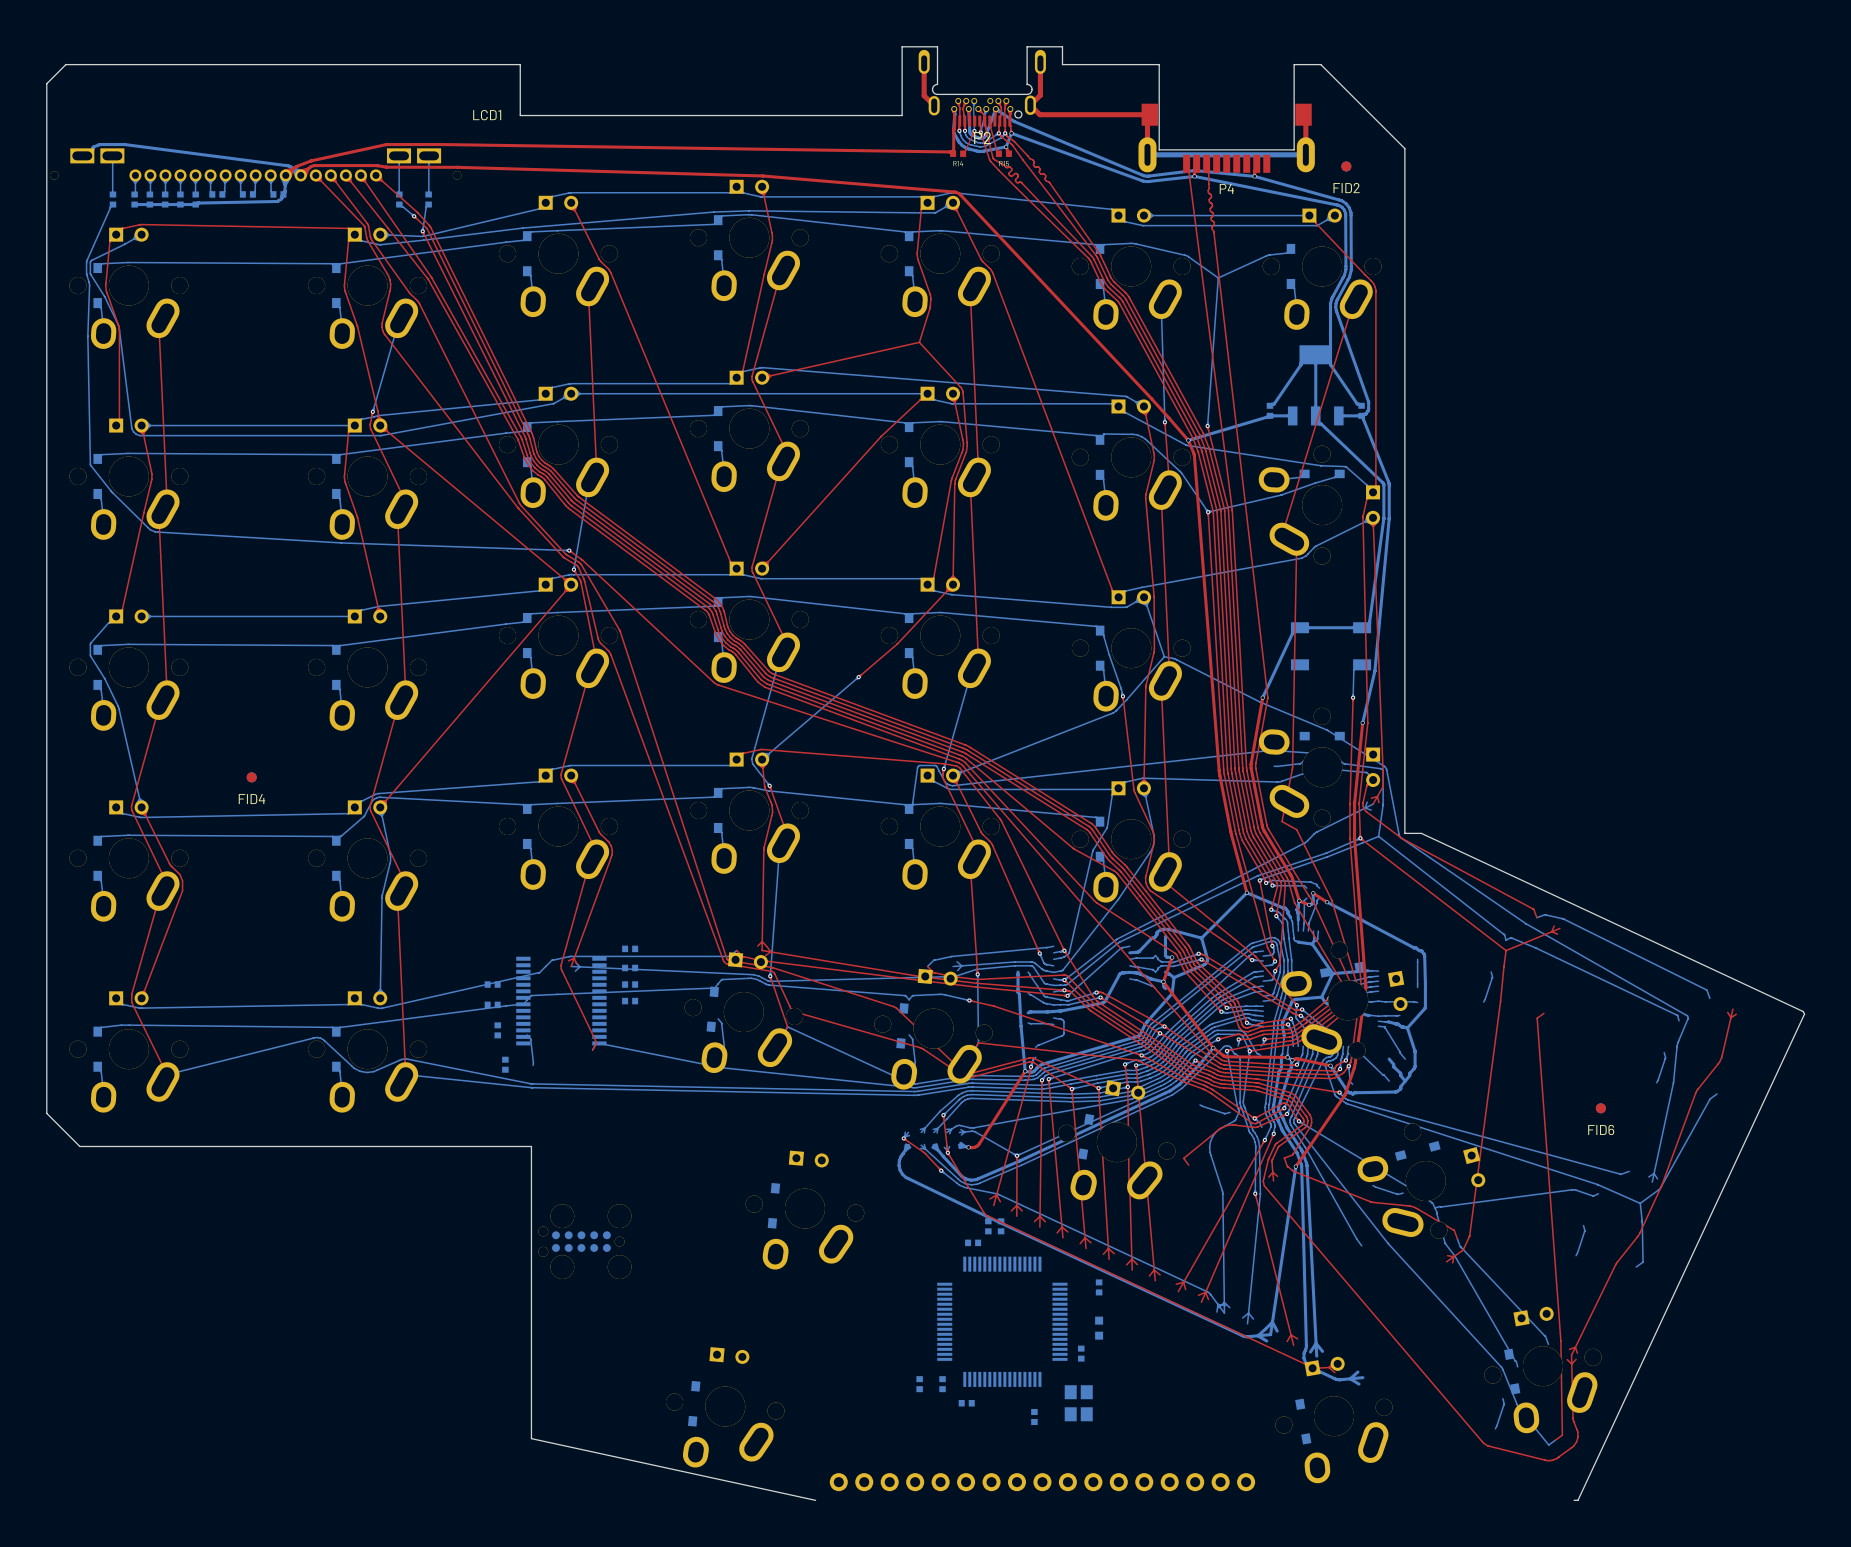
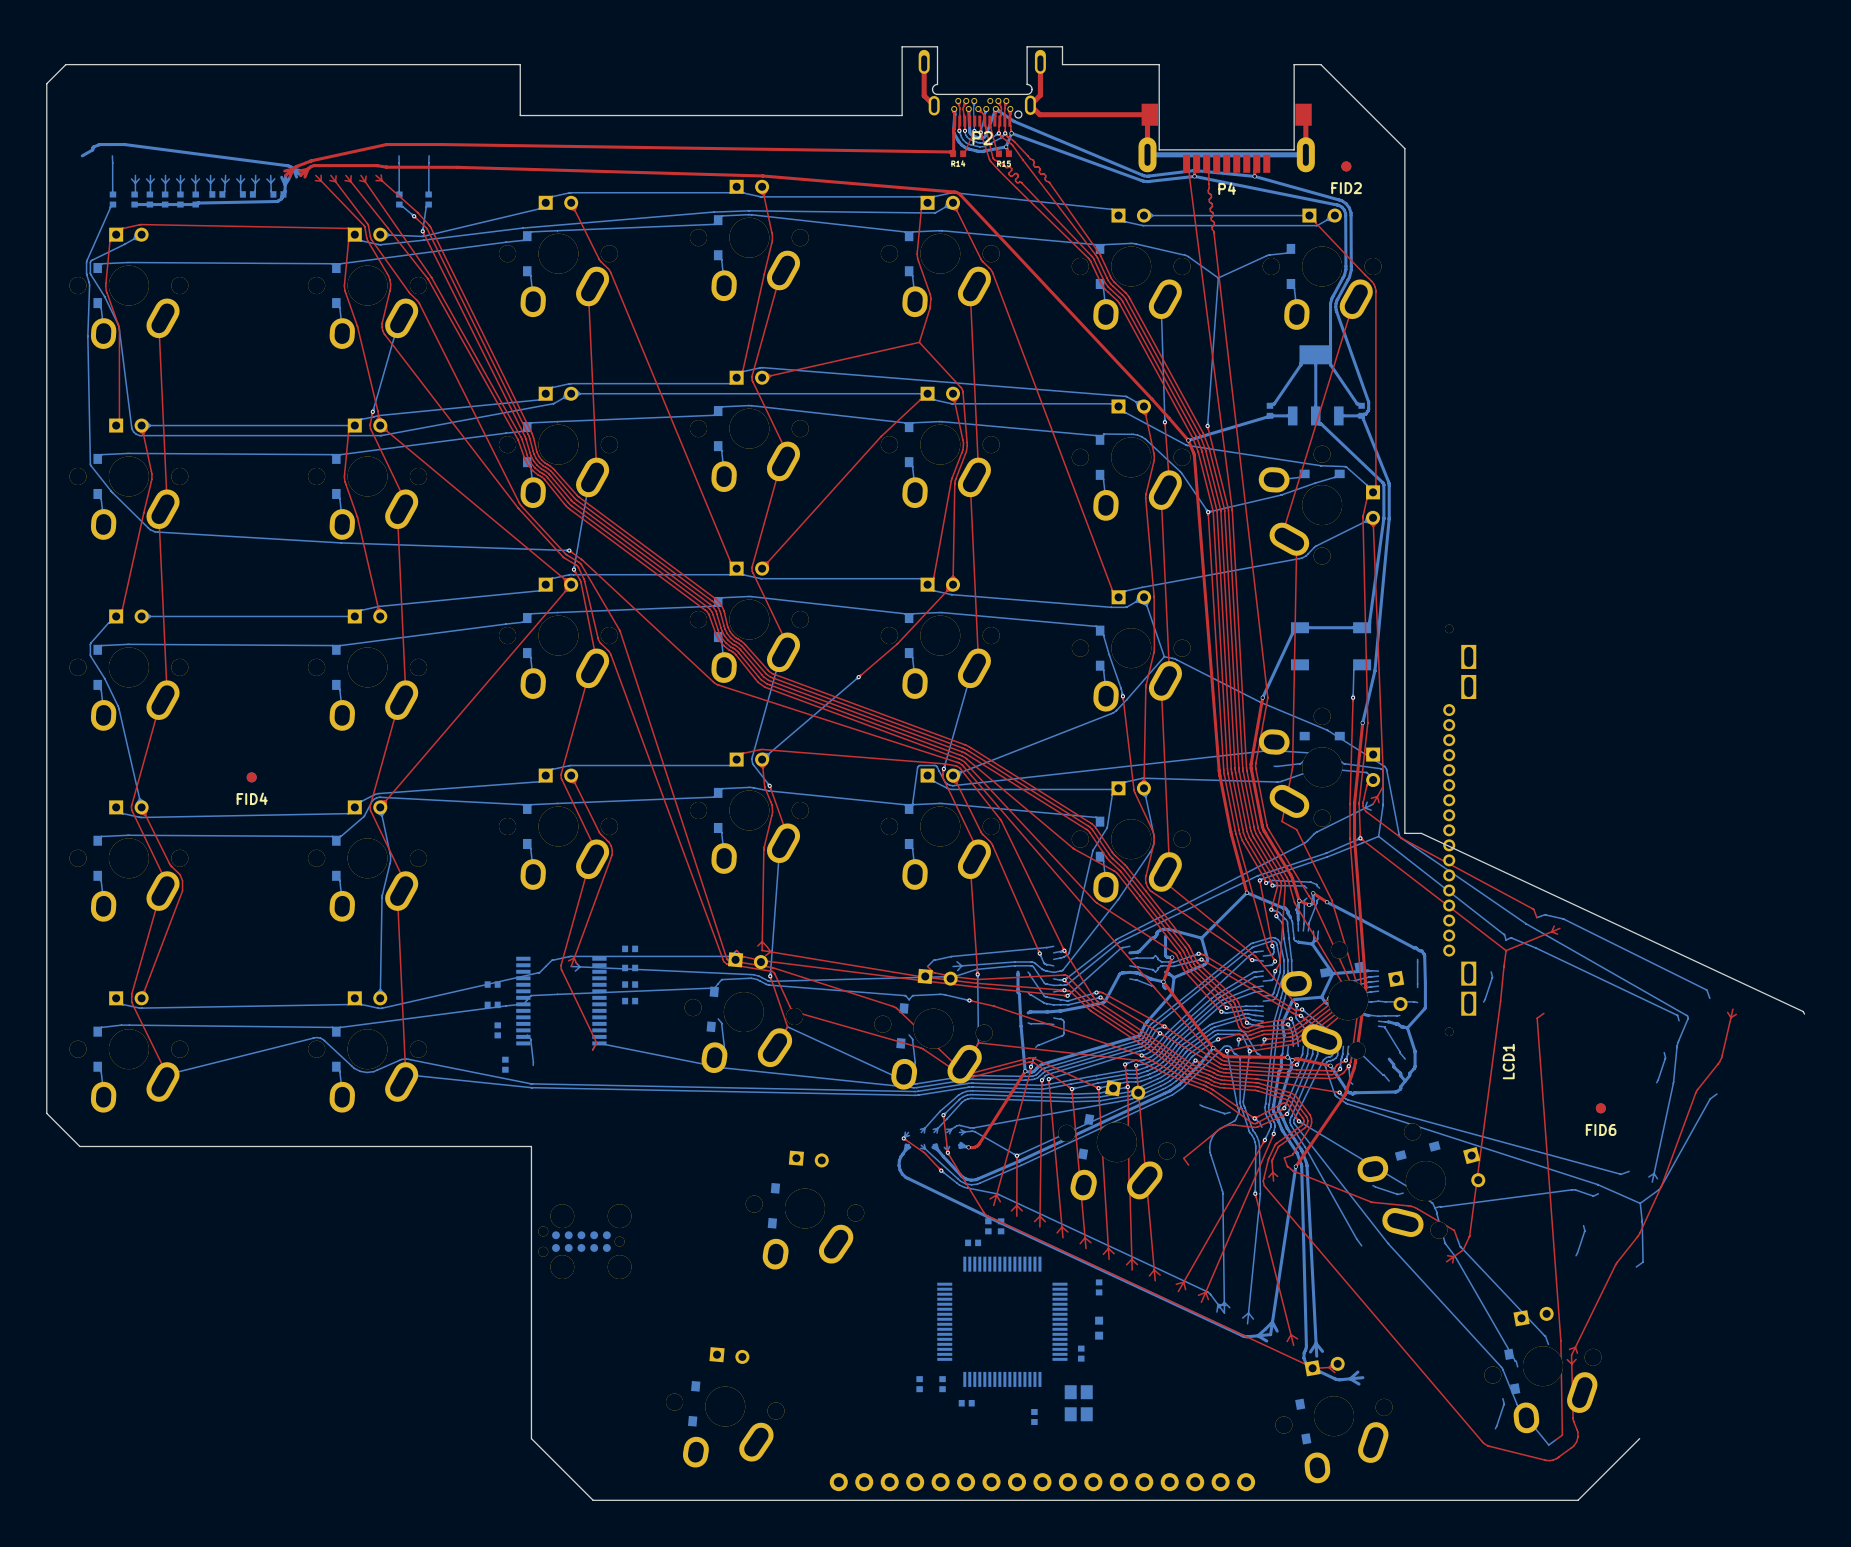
LCD1 rotation: 0° (255, 164) -> 90° clockwise (1459, 830)
LCD1 position: (255, 164) -> (1459, 830)
board edge: (1804, 1014) (1577, 1500) -> (1639, 1438) (1577, 1500)
board edge: (531, 1438) (815, 1500) -> (531, 1438) (593, 1500) (1574, 1500)

